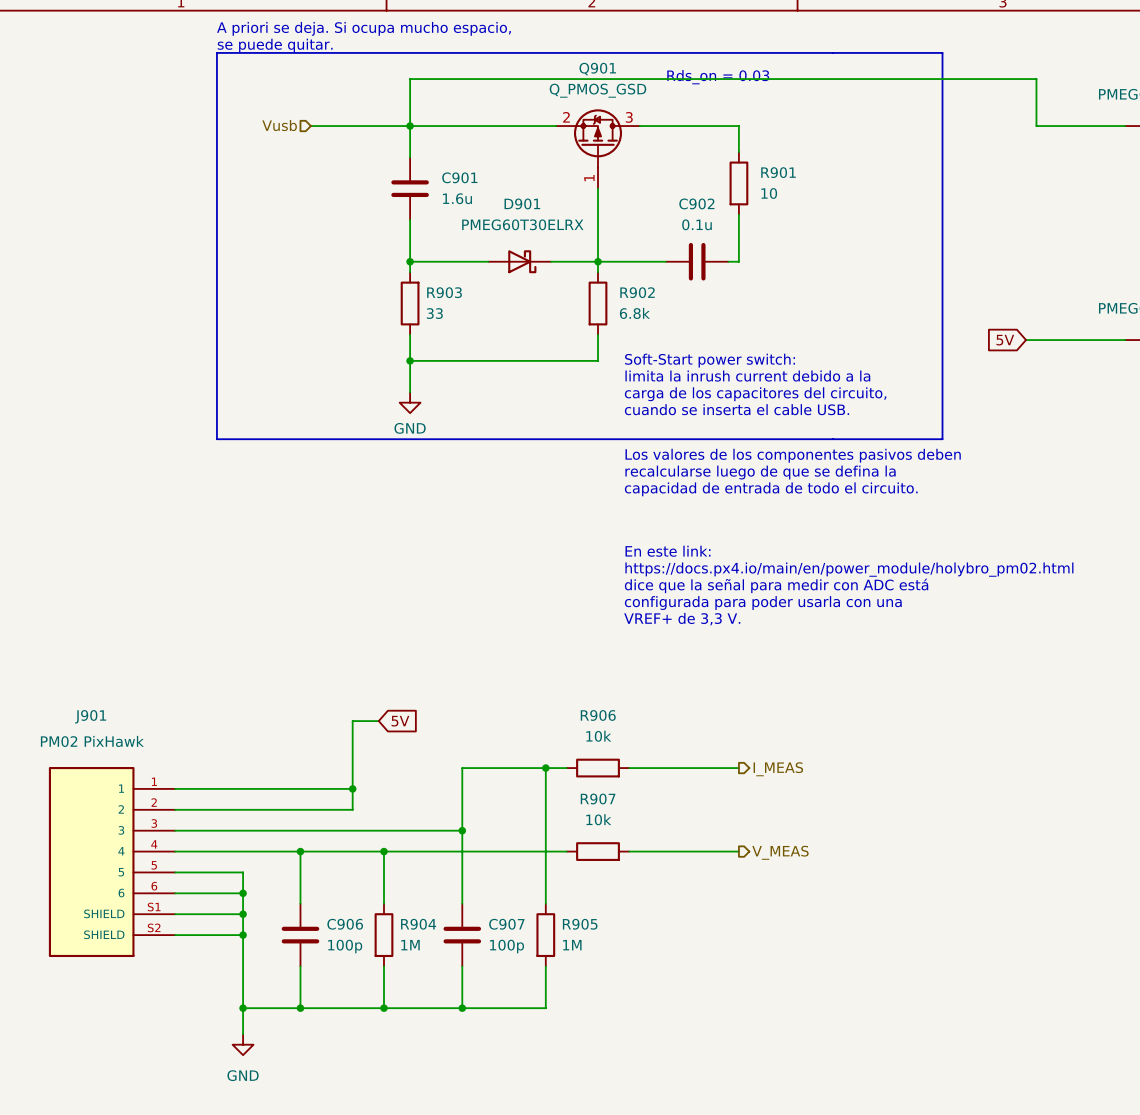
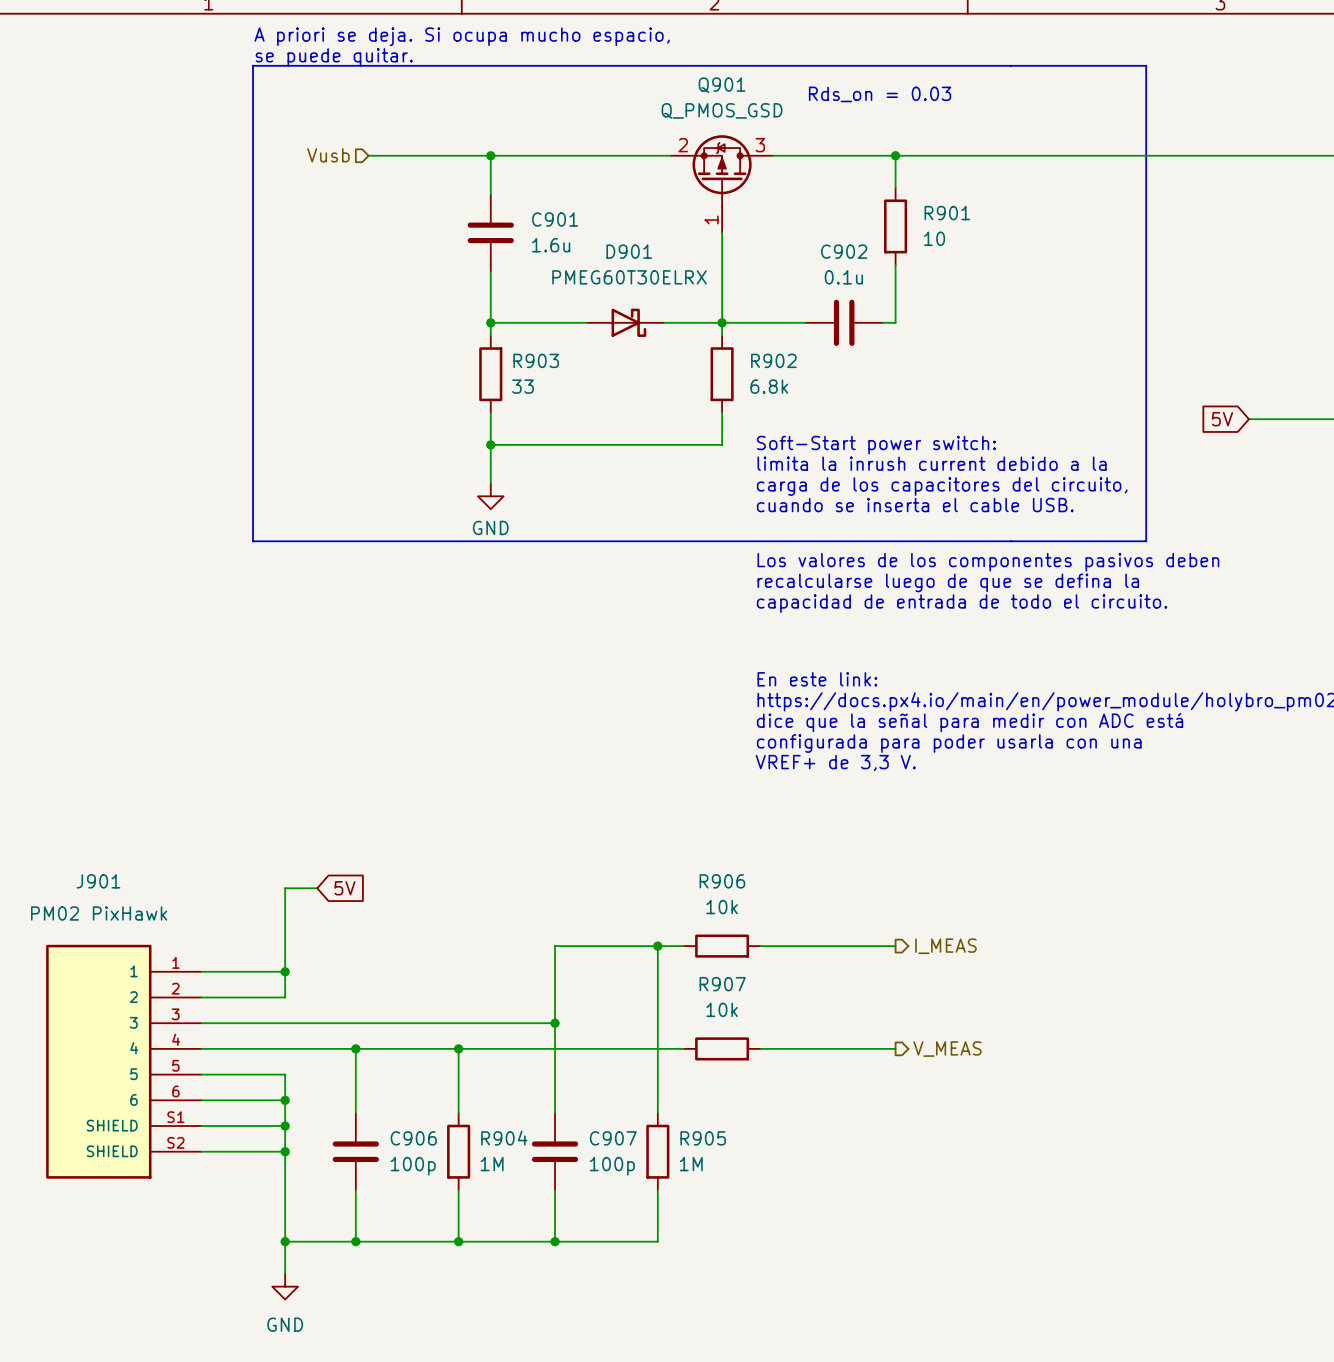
wire: (410, 126) (410, 79) (1036, 79) (1036, 126) -> (895, 155) (1261, 155)
junction: none -> (895, 155)
wire: (378, 721) (352, 721) (352, 809) (243, 809) -> (317, 888) (285, 888) (285, 997)
global label position: 5V (400, 721) -> 5V (344, 888)
wire: (243, 788) (352, 788) -> none
junction: none -> (285, 971)
junction: (352, 788) -> none

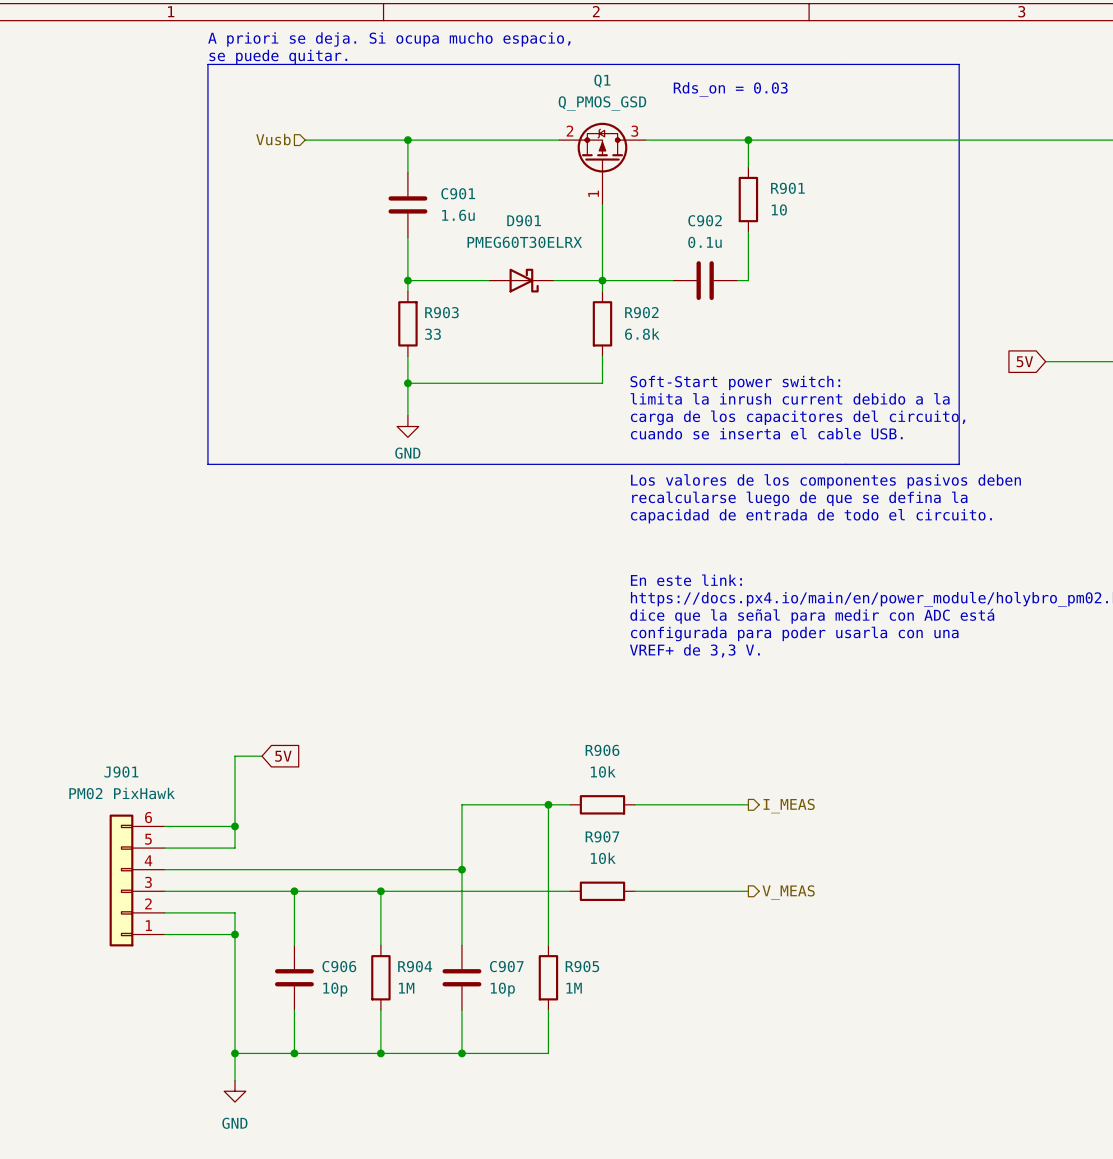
Q901 name: Q901 (722, 85) -> Q1 (602, 81)
J901 name position: J901 (98, 881) -> J901 (121, 772)
J901 value position: PM02 PixHawk (99, 913) -> PM02 PixHawk (122, 793)
J901 symbol: [46, 944, 202, 1179] -> [109, 814, 165, 947]
wire: (201, 1126) (285, 1126) -> none
junction: (285, 1126) -> none
wire: (201, 1151) (285, 1151) -> none
junction: (285, 1151) -> none
C906 value: 100p (413, 1166) -> 10p (335, 989)
C907 value: 100p (612, 1166) -> 10p (502, 989)

